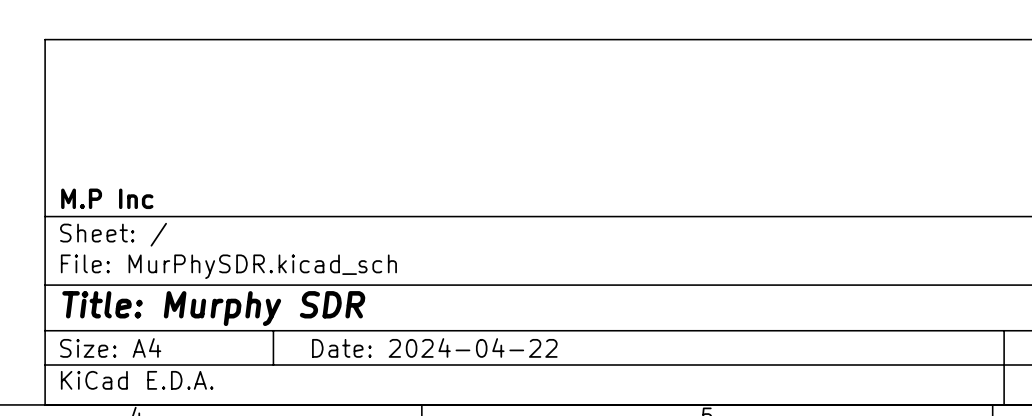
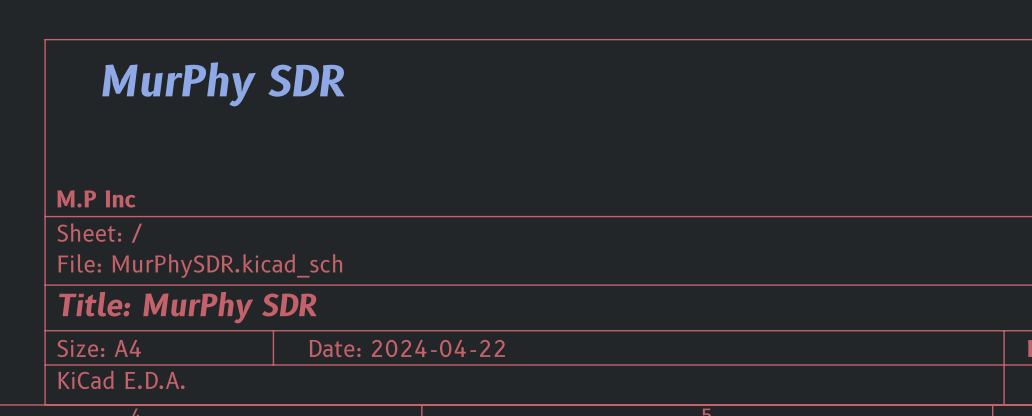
text: none -> MurPhy SDR (223, 84)
title block: Title: Murphy SDR (213, 308) -> Title: MurPhy SDR (187, 307)

